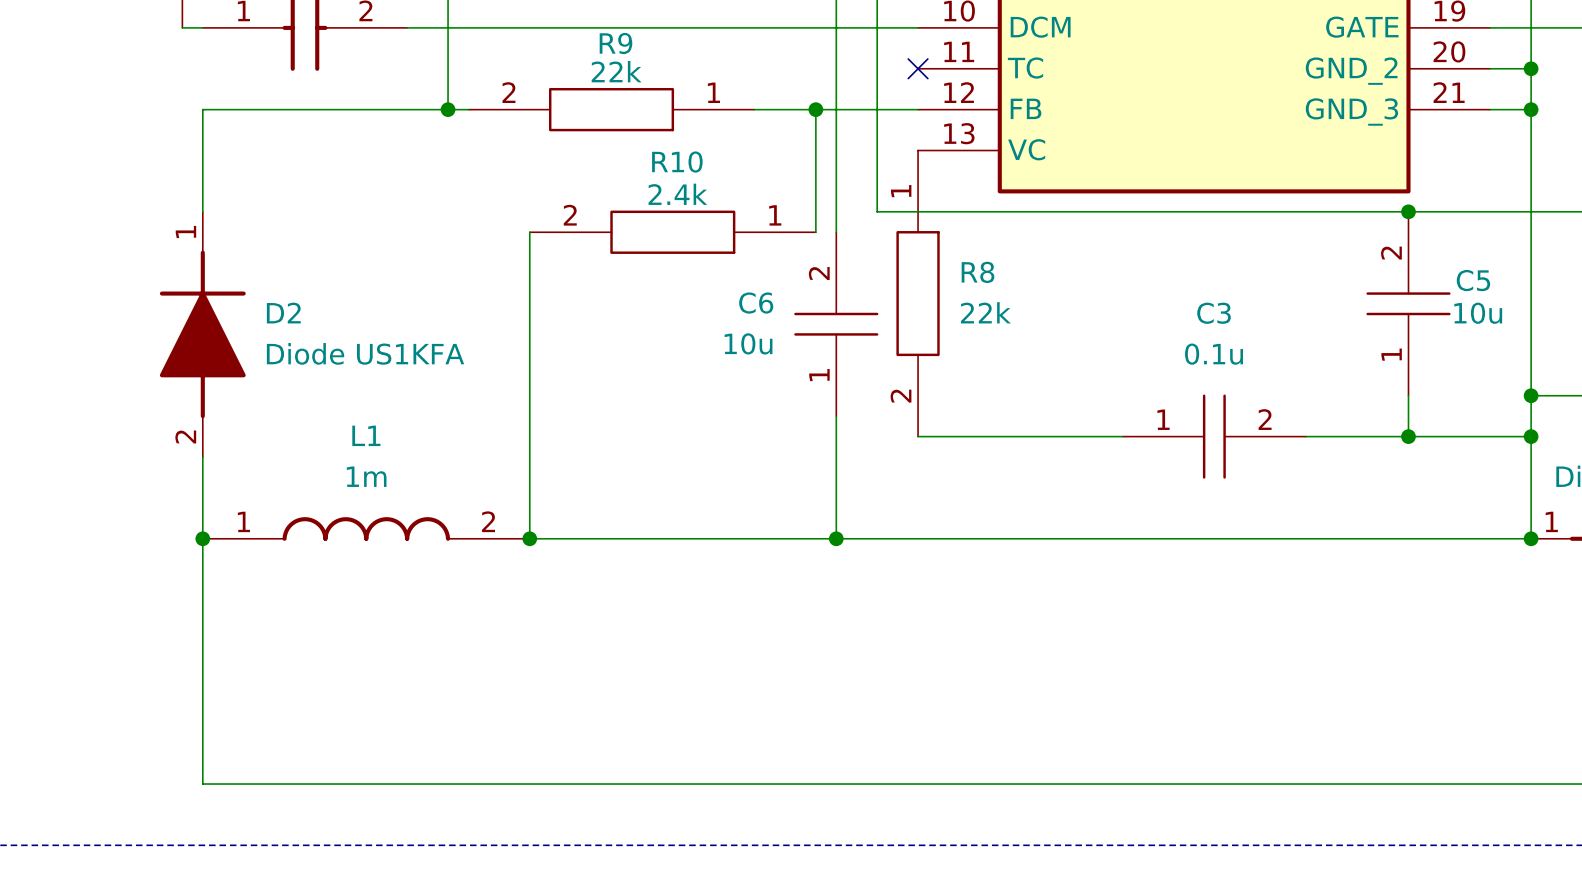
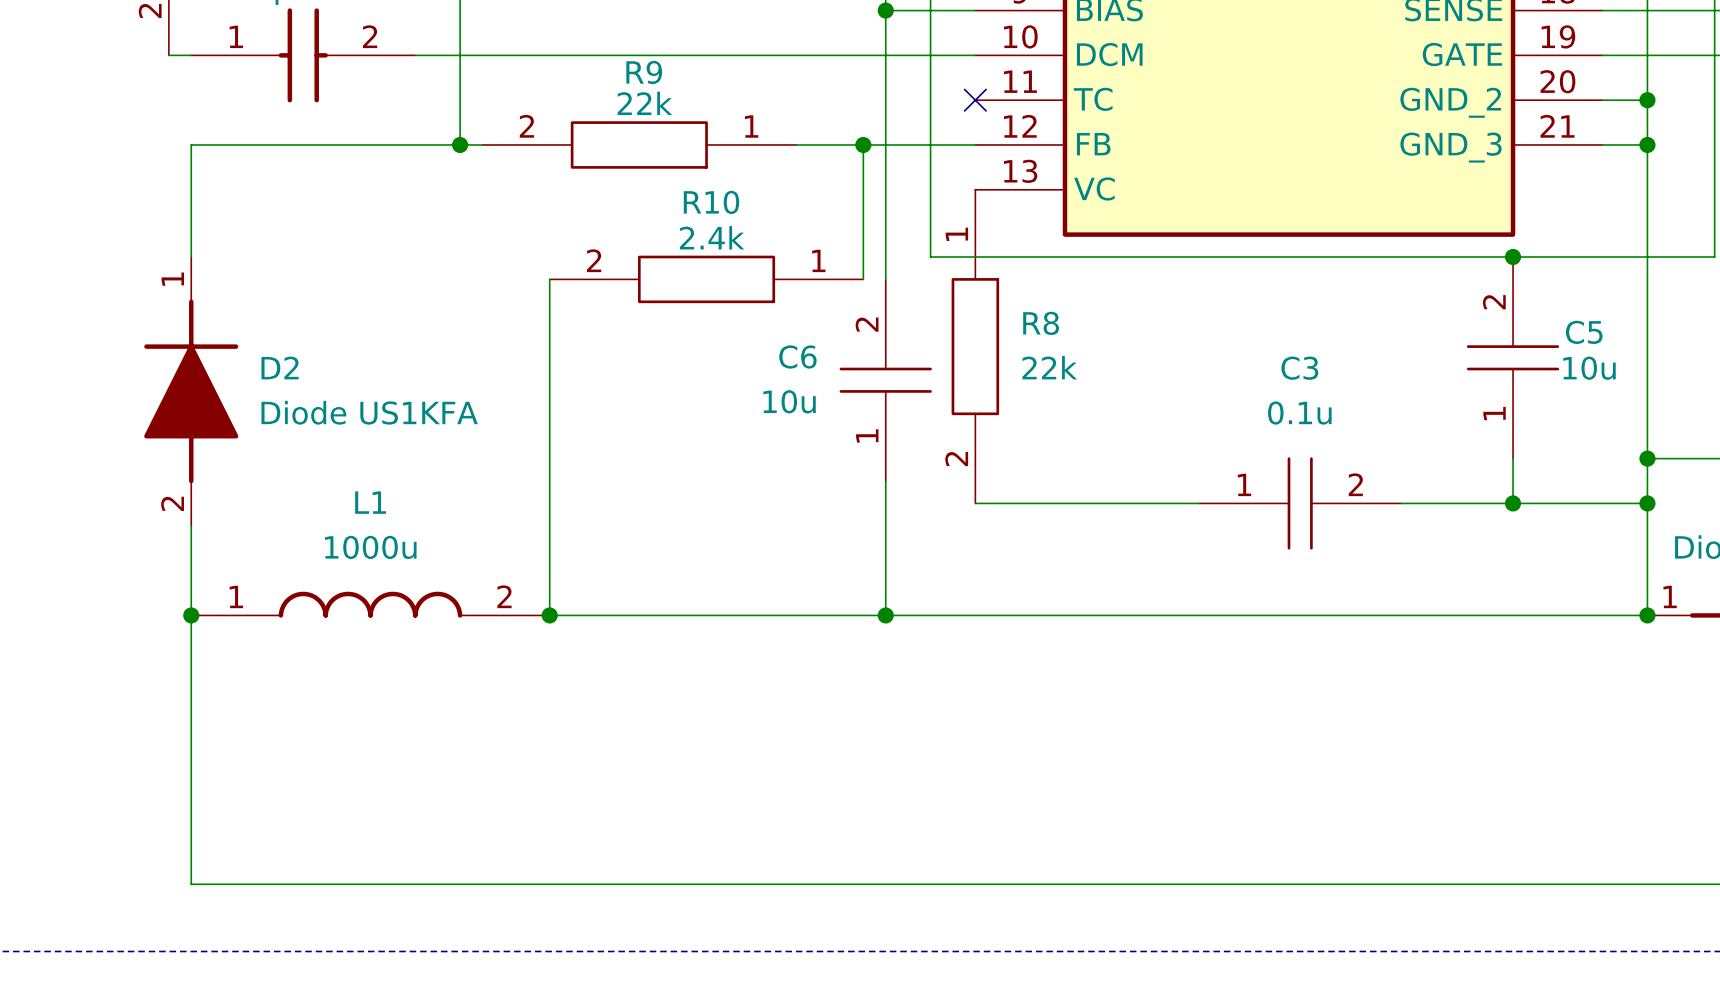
L1 value: 1m (366, 476) -> 1000u (370, 547)

